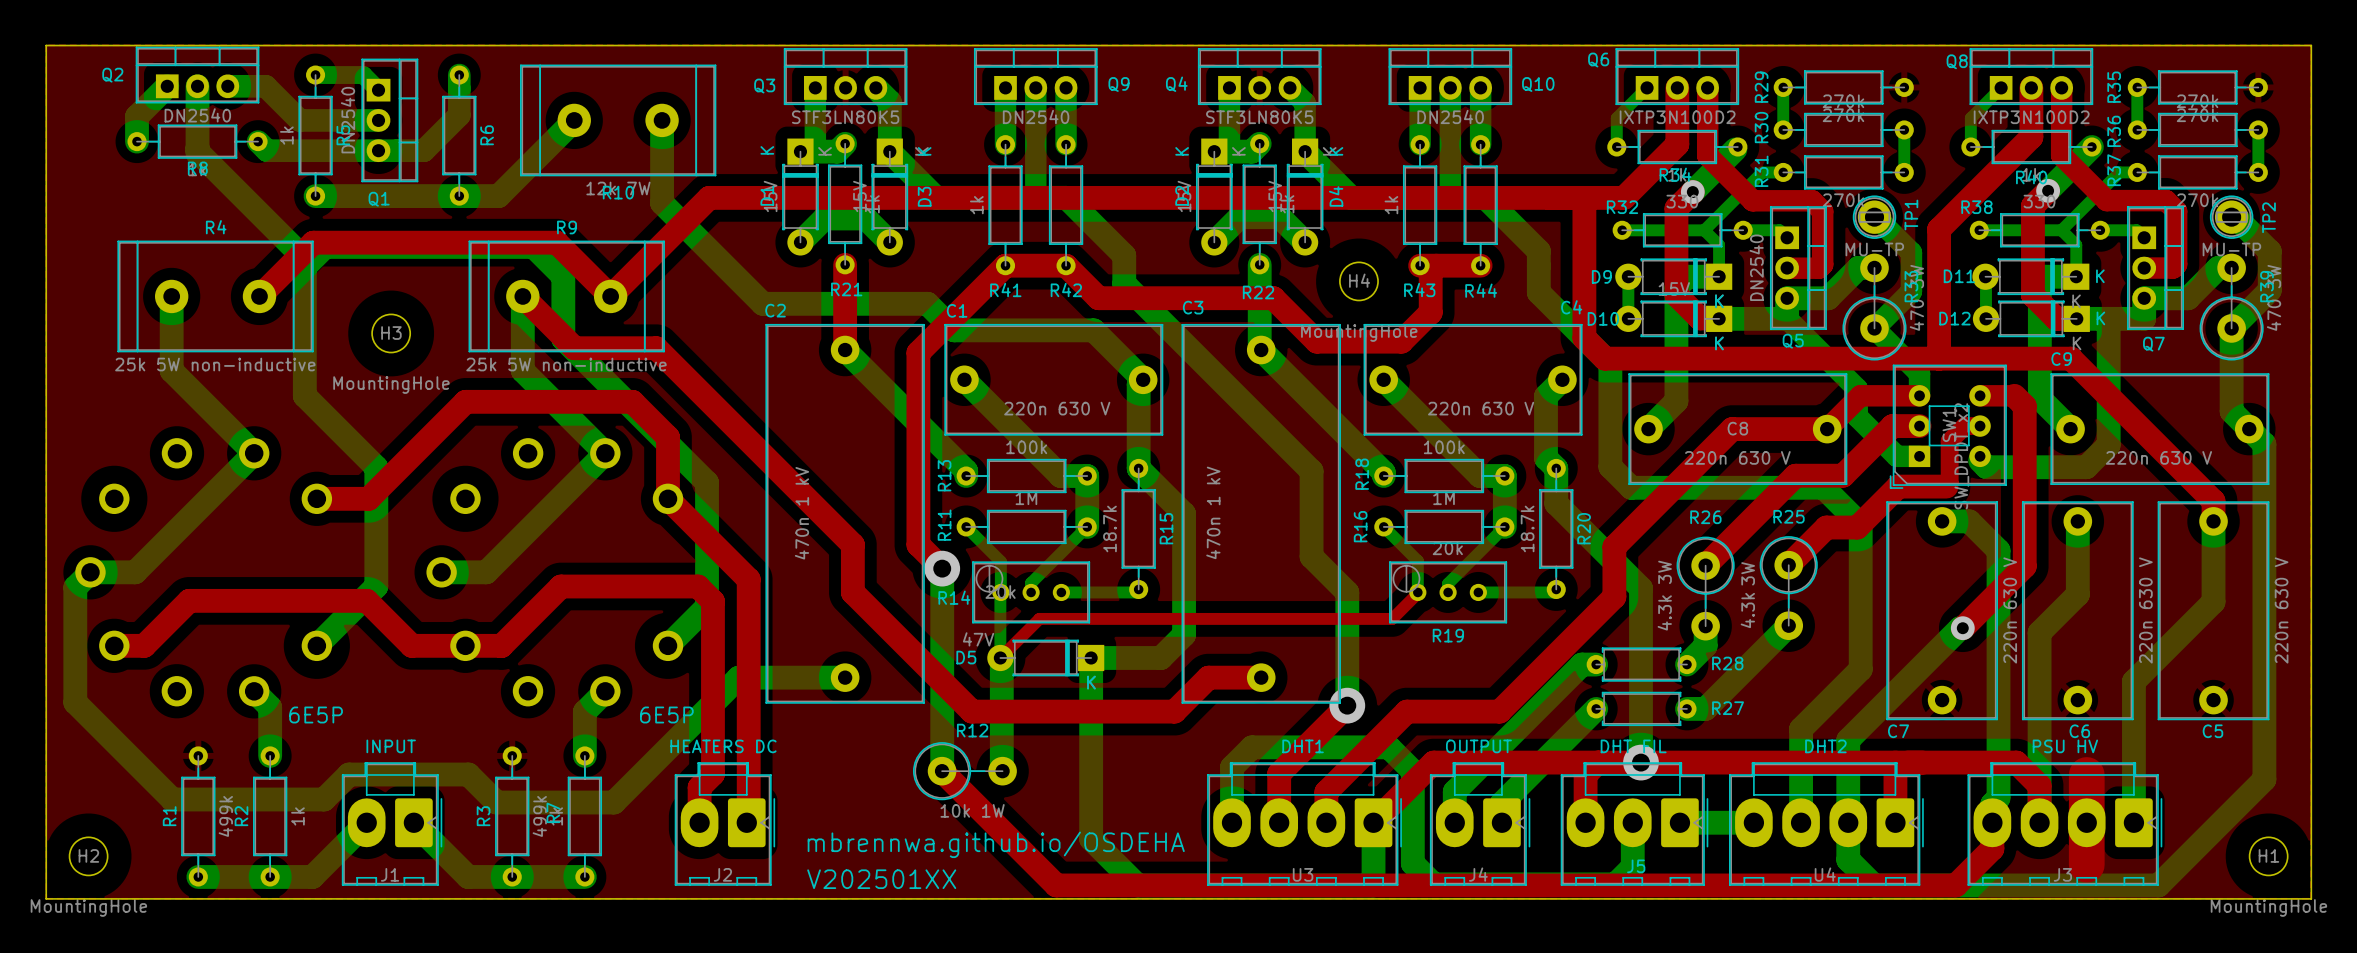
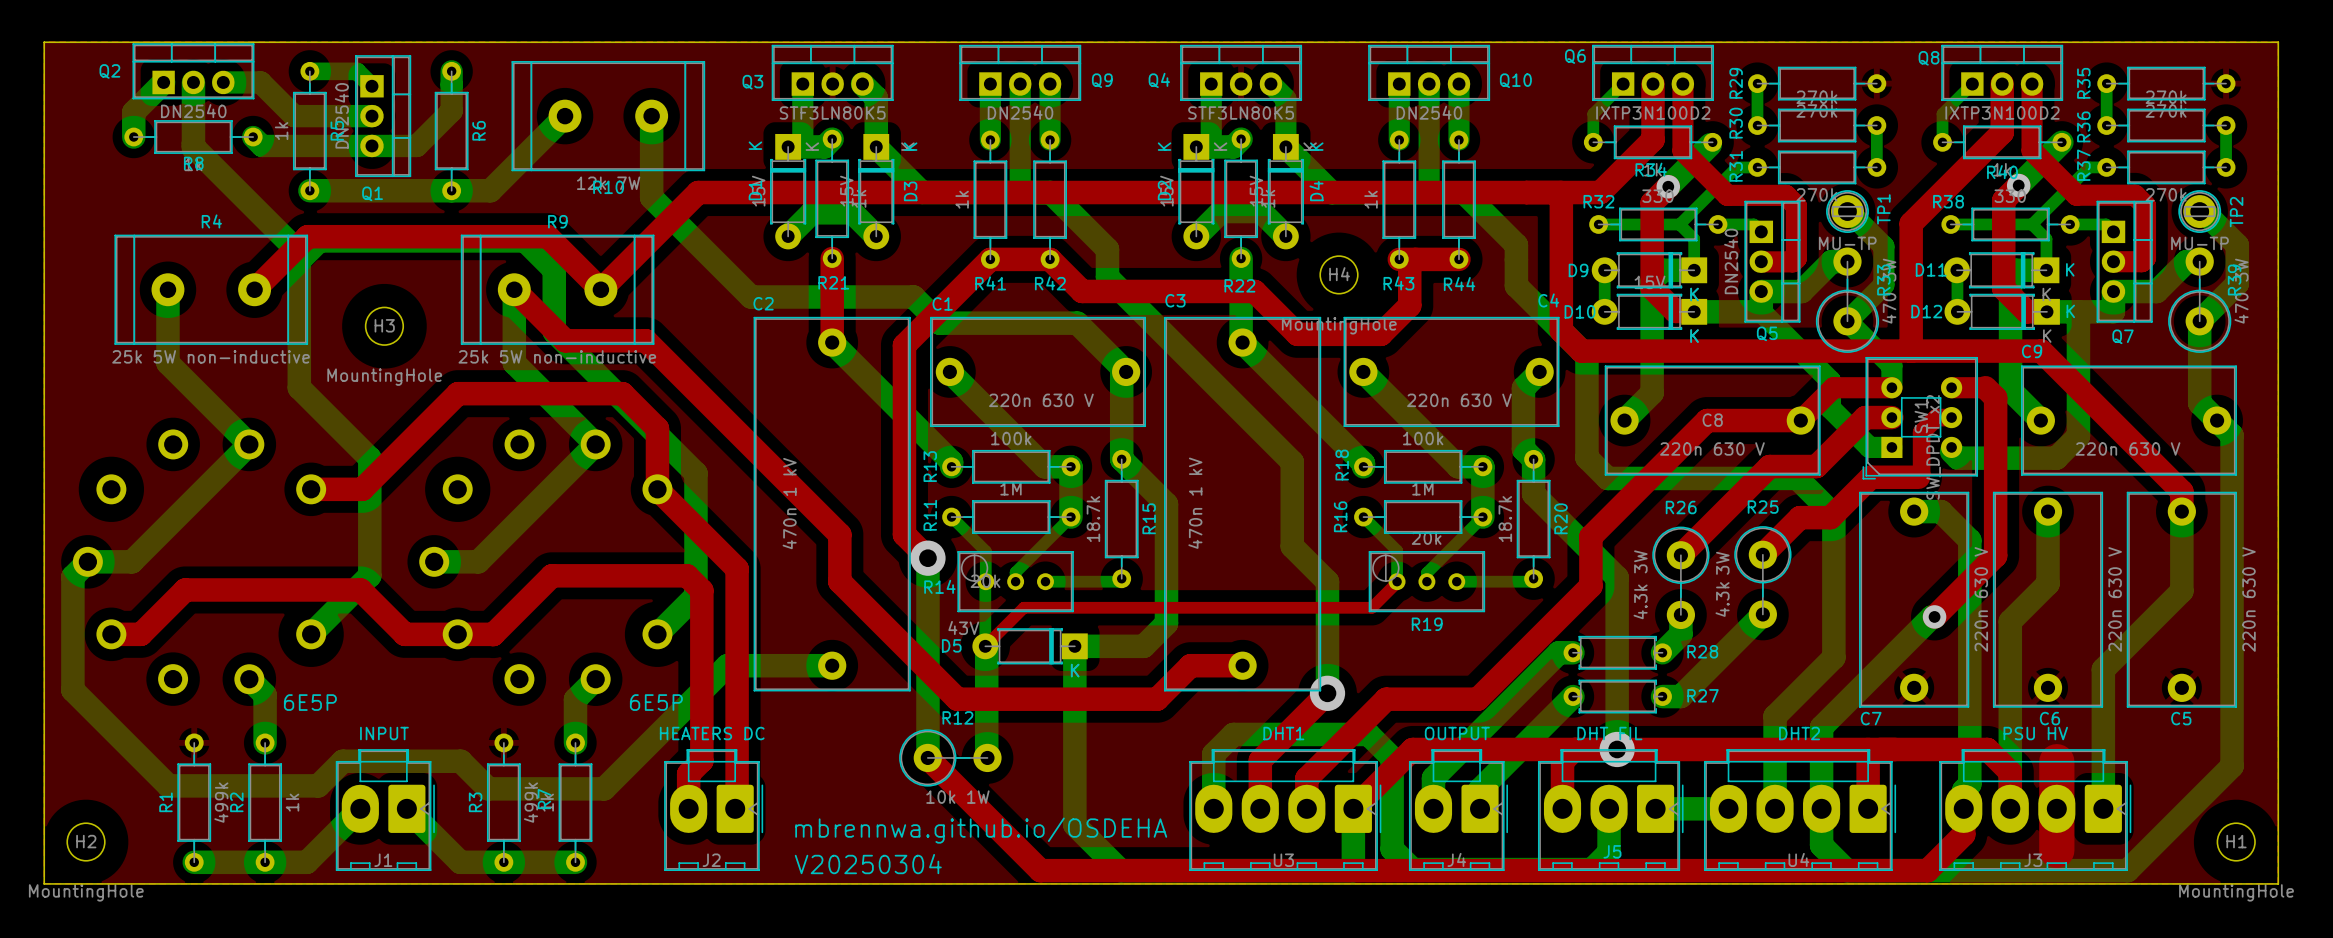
D5 value: 47V (978, 639) -> 43V (963, 627)
text: V202501XX (881, 879) -> V20250304 (868, 864)

